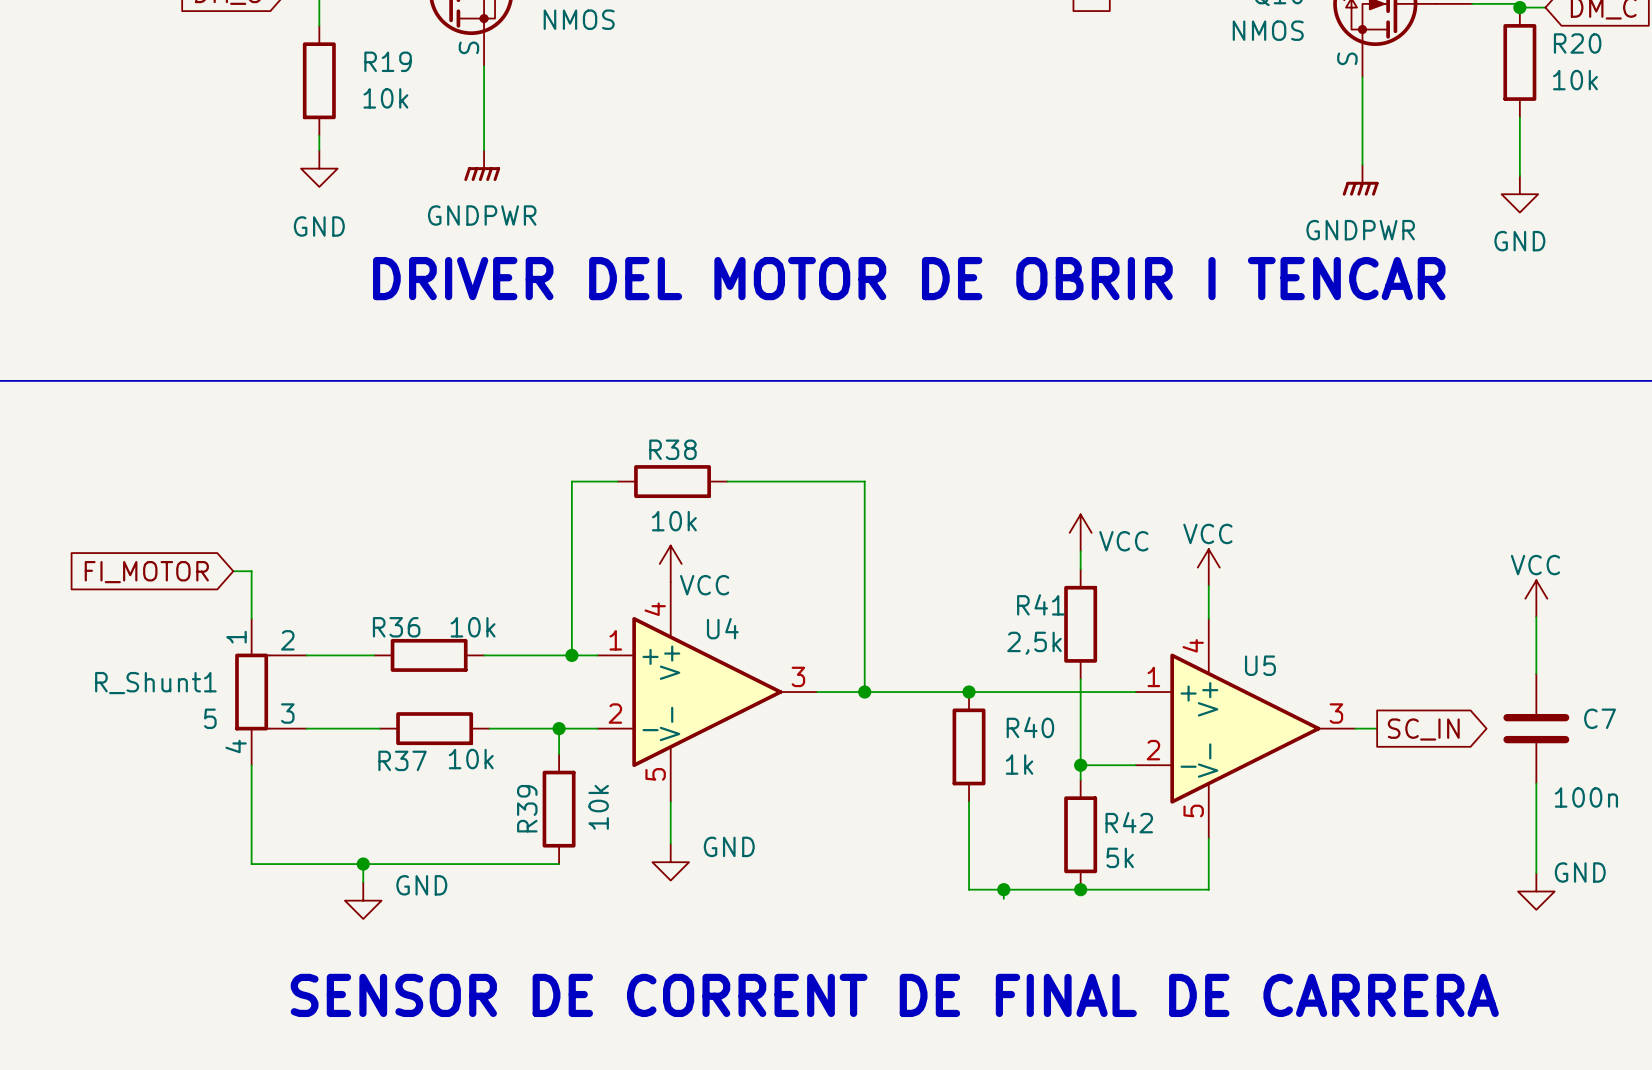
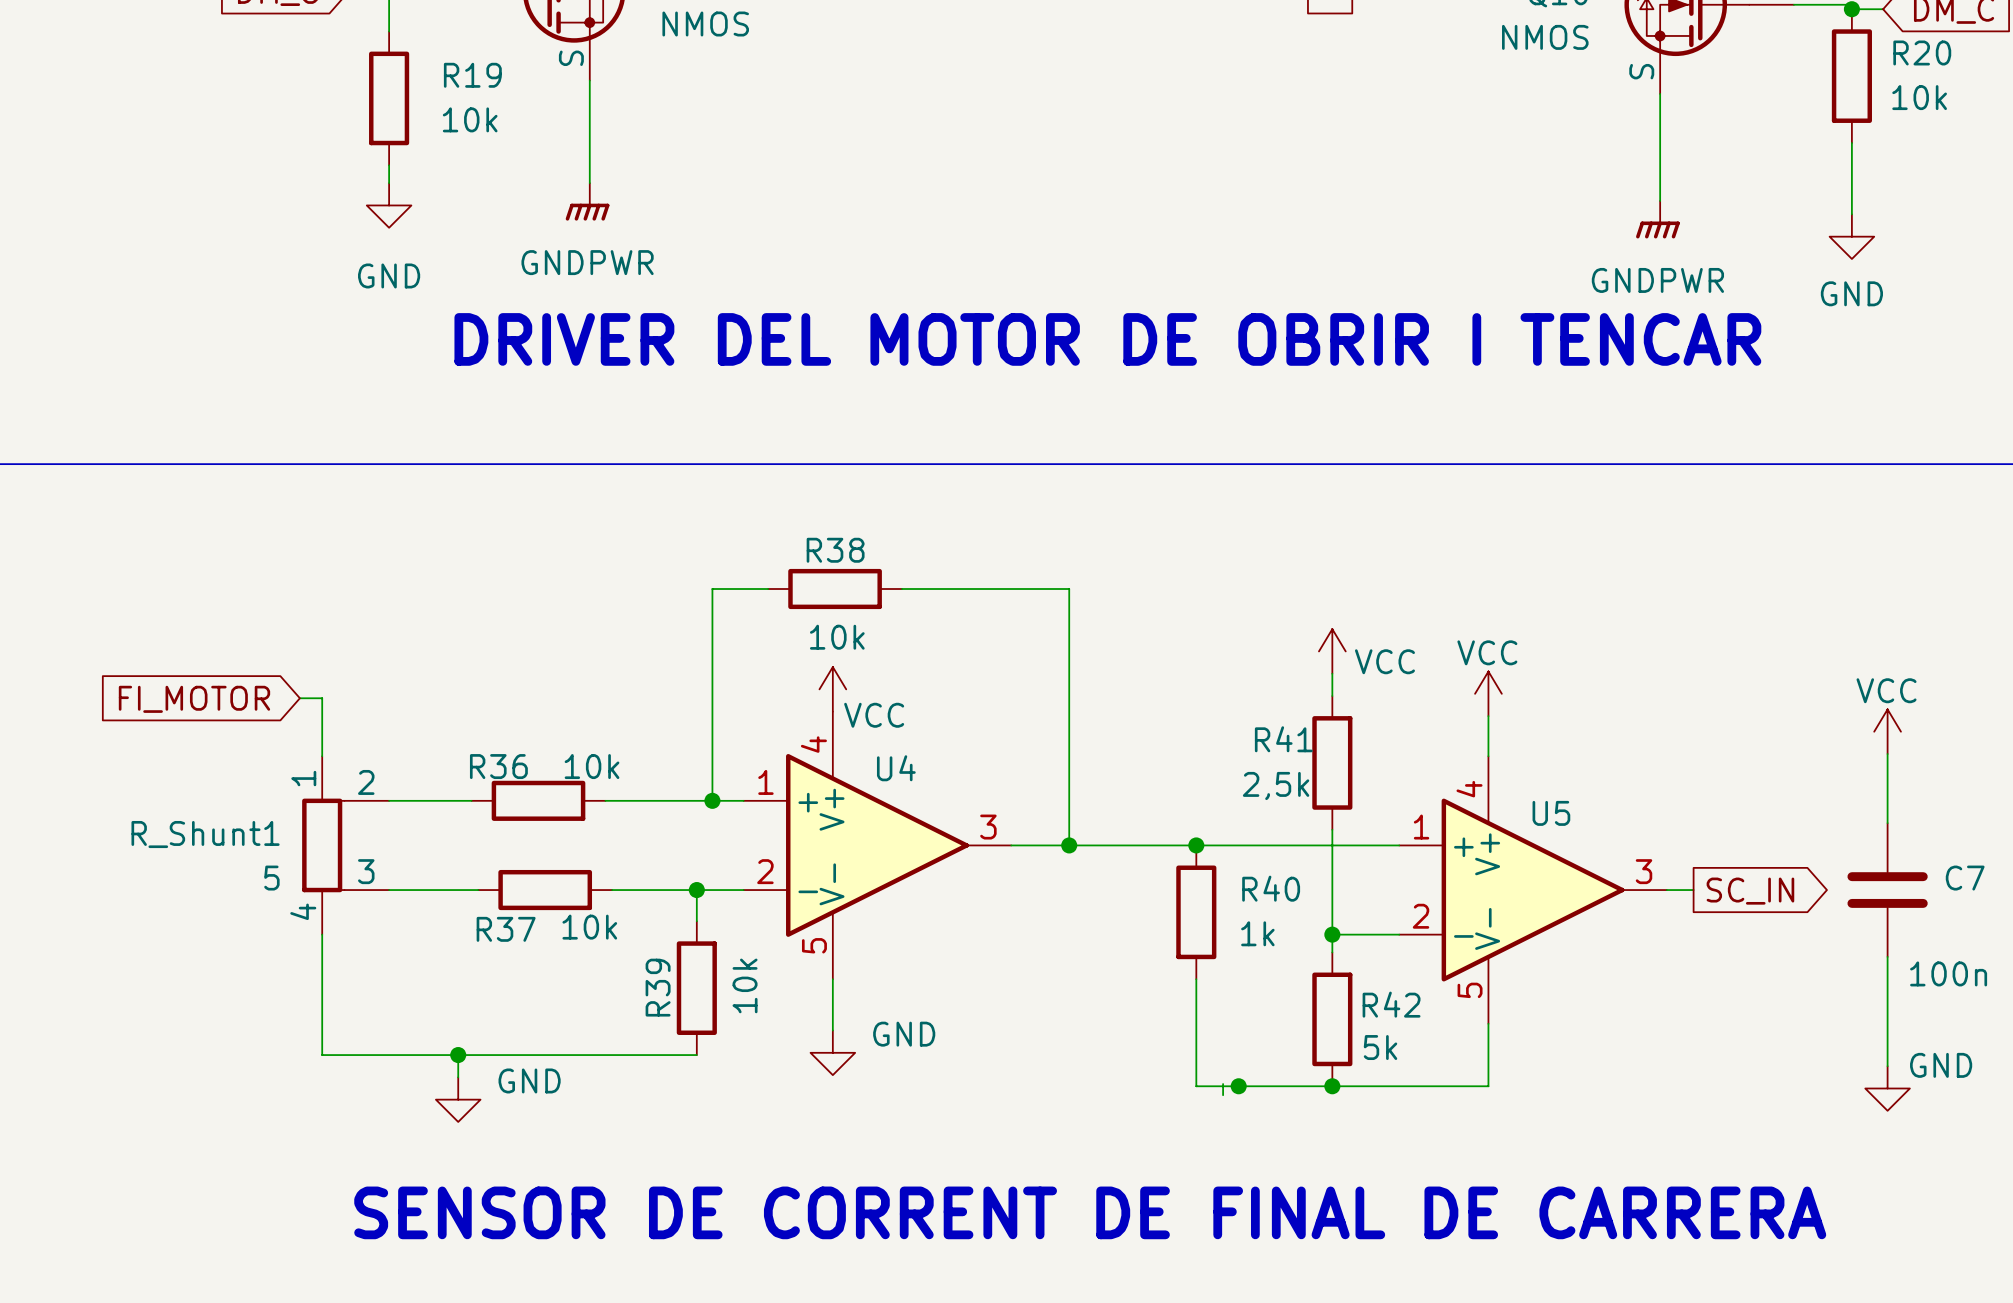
wire: (617, 481) (571, 481) (571, 655) -> (768, 589) (712, 589) (712, 800)
R38 position: (672, 481) -> (835, 589)
wire: (727, 481) (864, 481) (864, 692) -> (901, 589) (1069, 589) (1069, 845)
power symbol position: VCC (1080, 532) -> VCC (1332, 651)
wire: (1080, 551) (1080, 569) -> (1332, 673) (1332, 696)
power symbol position: VCC (670, 563) -> VCC (832, 689)
power symbol position: VCC (1208, 567) -> VCC (1488, 693)
wire: (233, 571) (251, 571) (251, 618) -> (299, 698) (322, 698) (322, 756)
global label position: FI_MOTOR (146, 572) -> FI_MOTOR (194, 699)
wire: (1208, 585) (1208, 618) -> (1488, 716) (1488, 756)
power symbol position: VCC (1536, 598) -> VCC (1887, 731)
wire: (1536, 616) (1536, 673) -> (1887, 754) (1887, 823)
R41 position: (1080, 624) -> (1332, 762)
wire: (306, 655) (374, 655) -> (389, 800) (471, 800)
R36 position: (429, 655) -> (538, 800)
wire: (484, 655) (597, 655) -> (605, 800) (743, 800)
junction position: (571, 655) -> (712, 800)
wire: (1080, 679) (1080, 779) -> (1332, 829) (1332, 952)
R_Shunt1 position: (270, 692) -> (345, 845)
U4 position: (707, 692) -> (877, 845)
wire: (817, 692) (1135, 692) -> (1011, 845) (1399, 845)
junction position: (864, 692) -> (1069, 845)
junction position: (969, 692) -> (1196, 845)
wire: (306, 728) (379, 728) -> (389, 890) (478, 890)
R37 position: (434, 728) -> (545, 890)
wire: (489, 728) (597, 728) -> (612, 890) (743, 890)
wire: (559, 728) (559, 754) -> (696, 890) (696, 921)
junction position: (559, 728) -> (696, 890)
U5 position: (1245, 728) -> (1533, 890)
wire: (1355, 728) (1377, 728) -> (1666, 890) (1693, 890)
C7 position: (1536, 728) -> (1887, 890)
global label position: SC_IN (1423, 729) -> SC_IN (1750, 891)
R40 position: (969, 746) -> (1196, 912)
wire: (251, 765) (251, 864) (559, 864) -> (322, 934) (322, 1055) (696, 1055)
wire: (1080, 765) (1135, 765) -> (1332, 934) (1399, 934)
junction position: (1080, 765) -> (1332, 934)
wire: (1536, 783) (1536, 873) -> (1887, 956) (1887, 1066)
wire: (670, 801) (670, 843) -> (832, 979) (832, 1030)
wire: (969, 801) (969, 889) (1208, 889) (1208, 838) -> (1196, 979) (1196, 1086) (1488, 1086) (1488, 1023)
R39 position: (559, 809) -> (696, 988)
R42 position: (1080, 834) -> (1332, 1019)
power symbol position: GND (670, 862) -> GND (832, 1052)
wire: (363, 864) (363, 882) -> (458, 1055) (458, 1077)
junction position: (363, 864) -> (458, 1055)
junction position: (1003, 889) -> (1238, 1086)
junction position: (1080, 889) -> (1332, 1086)
power symbol position: GND (1536, 891) -> GND (1887, 1088)
power symbol position: GND (363, 900) -> GND (458, 1099)

